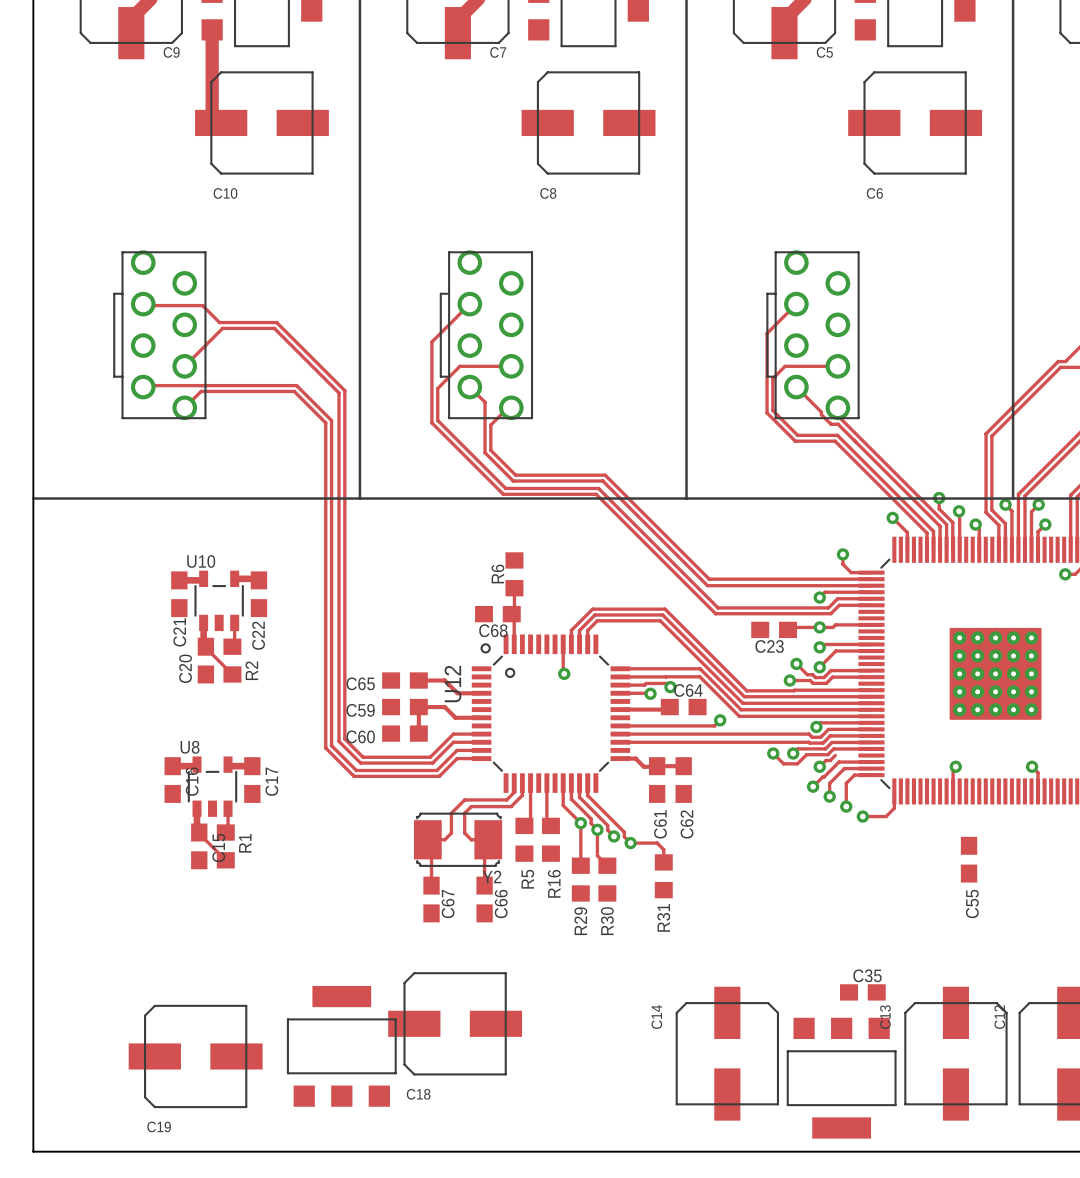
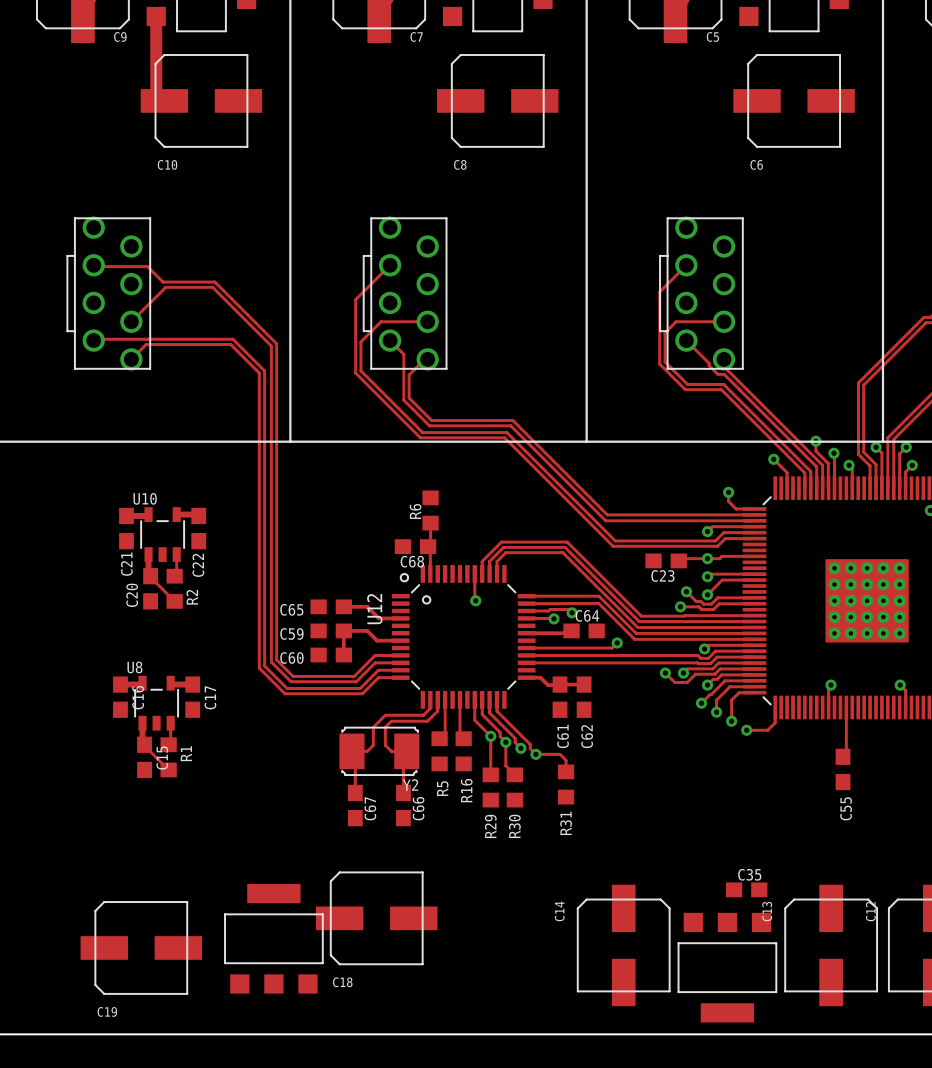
track: none -> (721, 674) (754, 674)
track: none -> (846, 707) (846, 753)

